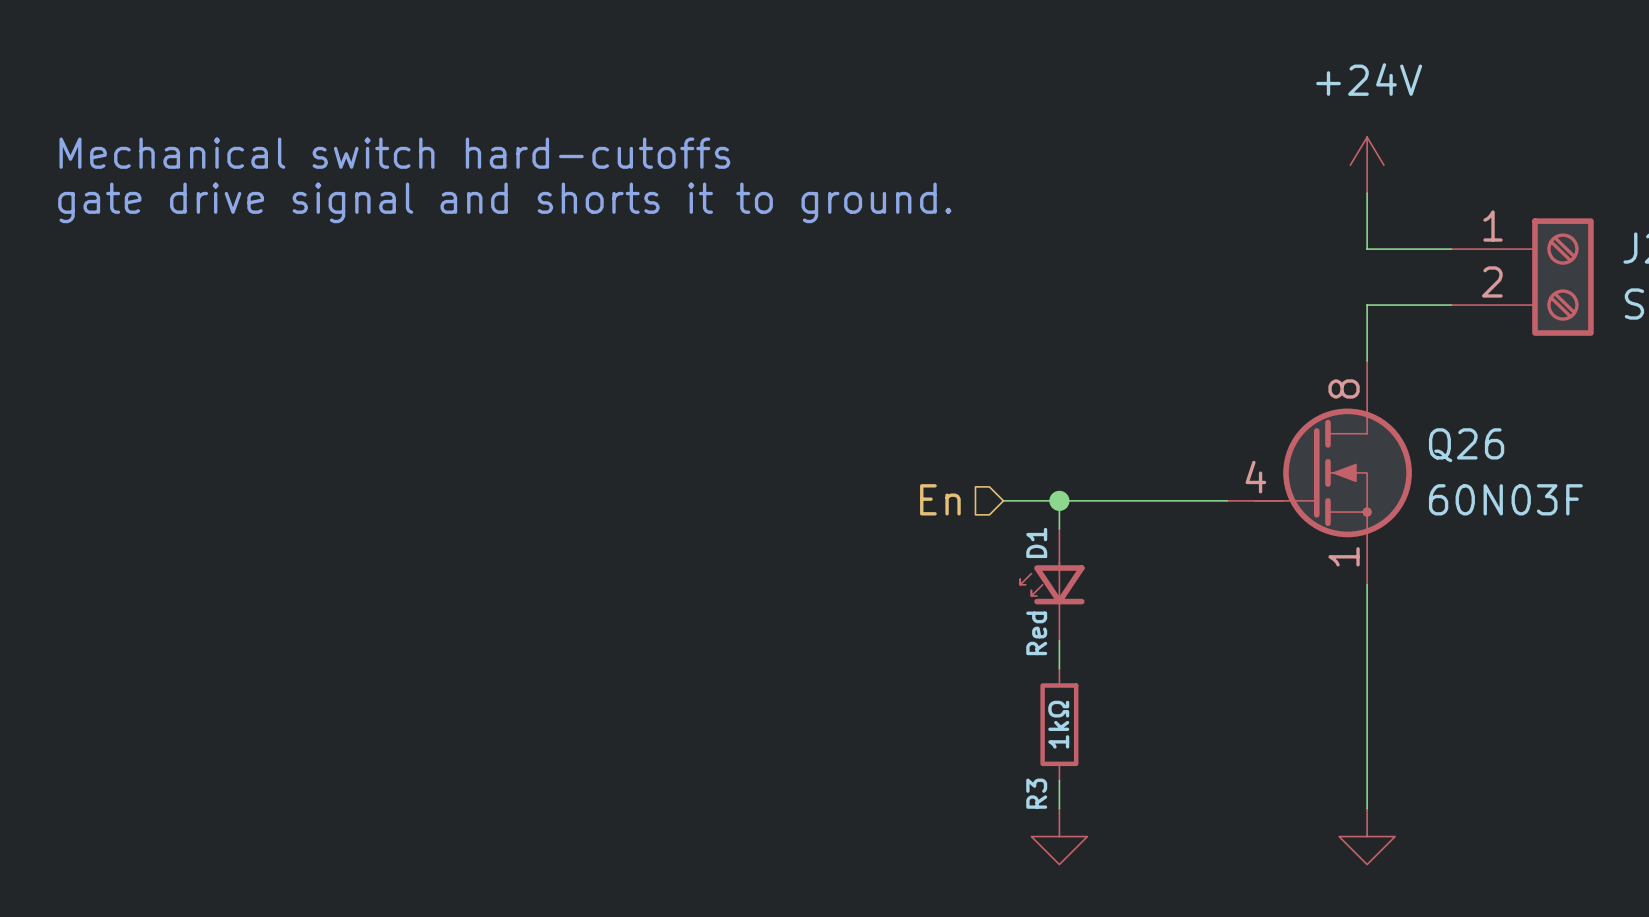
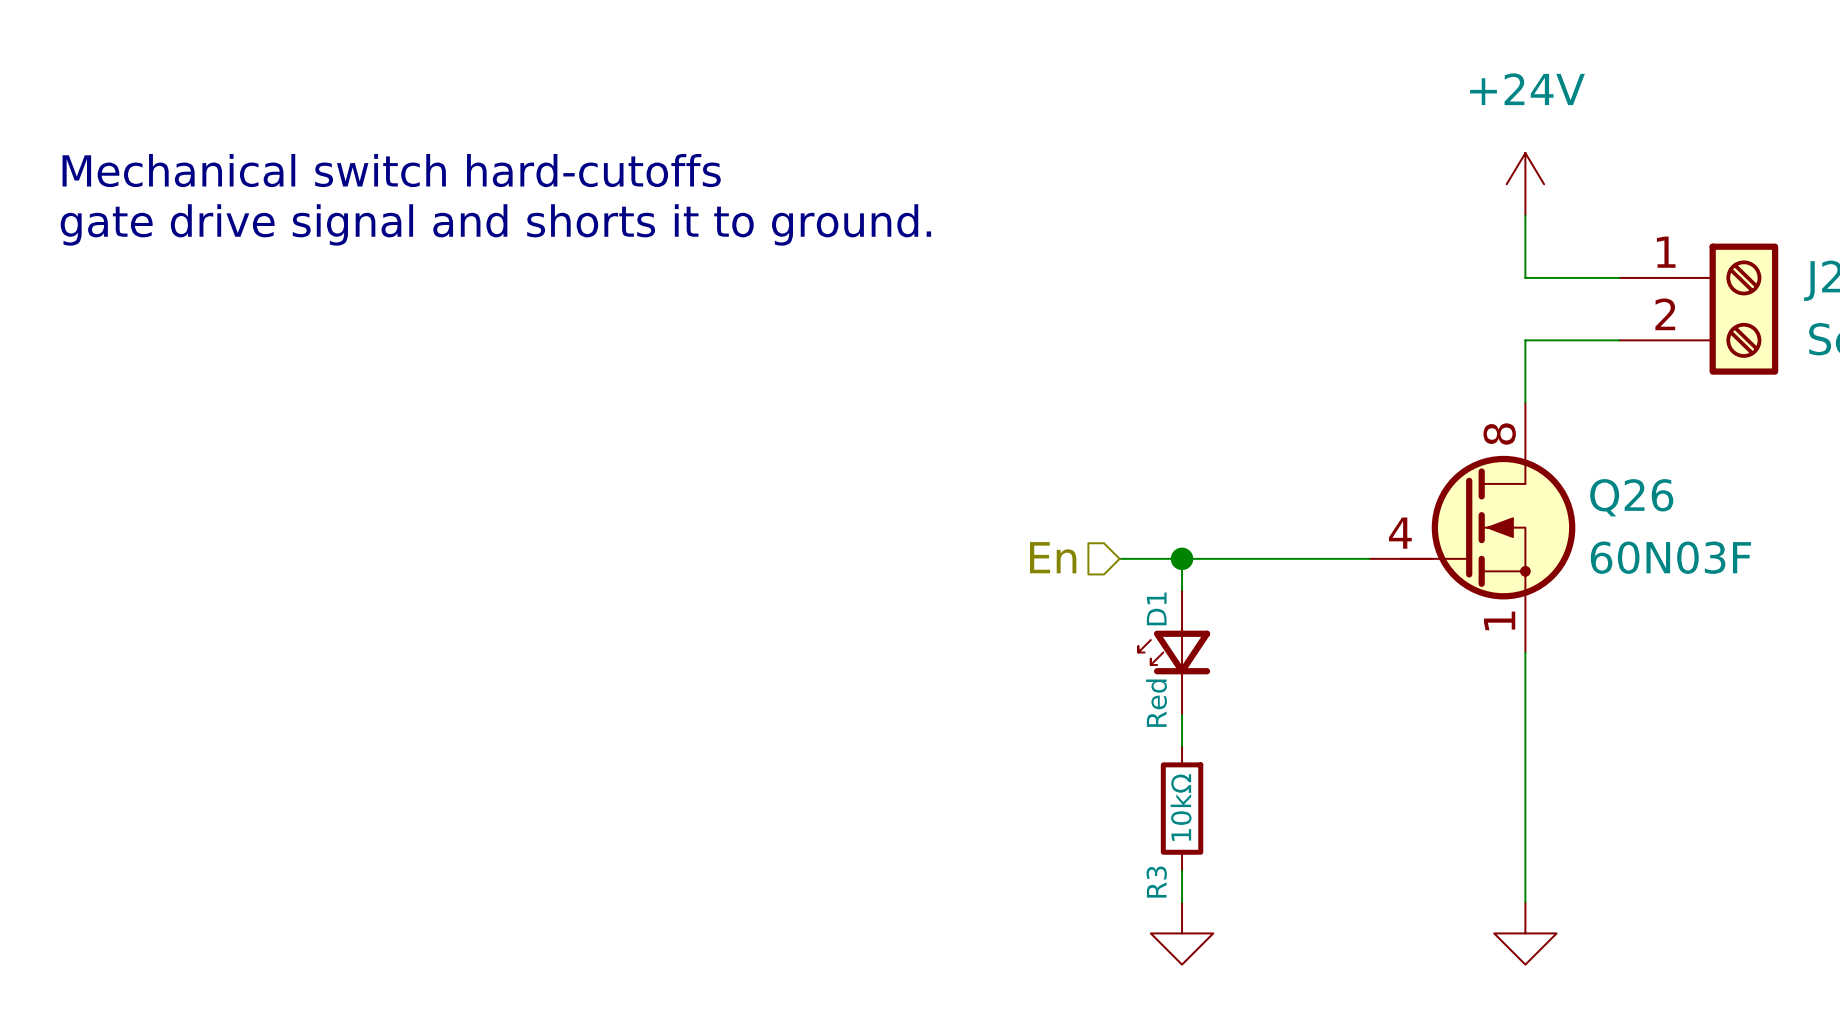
R3 value: 1kΩ (1058, 724) -> 10kΩ (1181, 807)

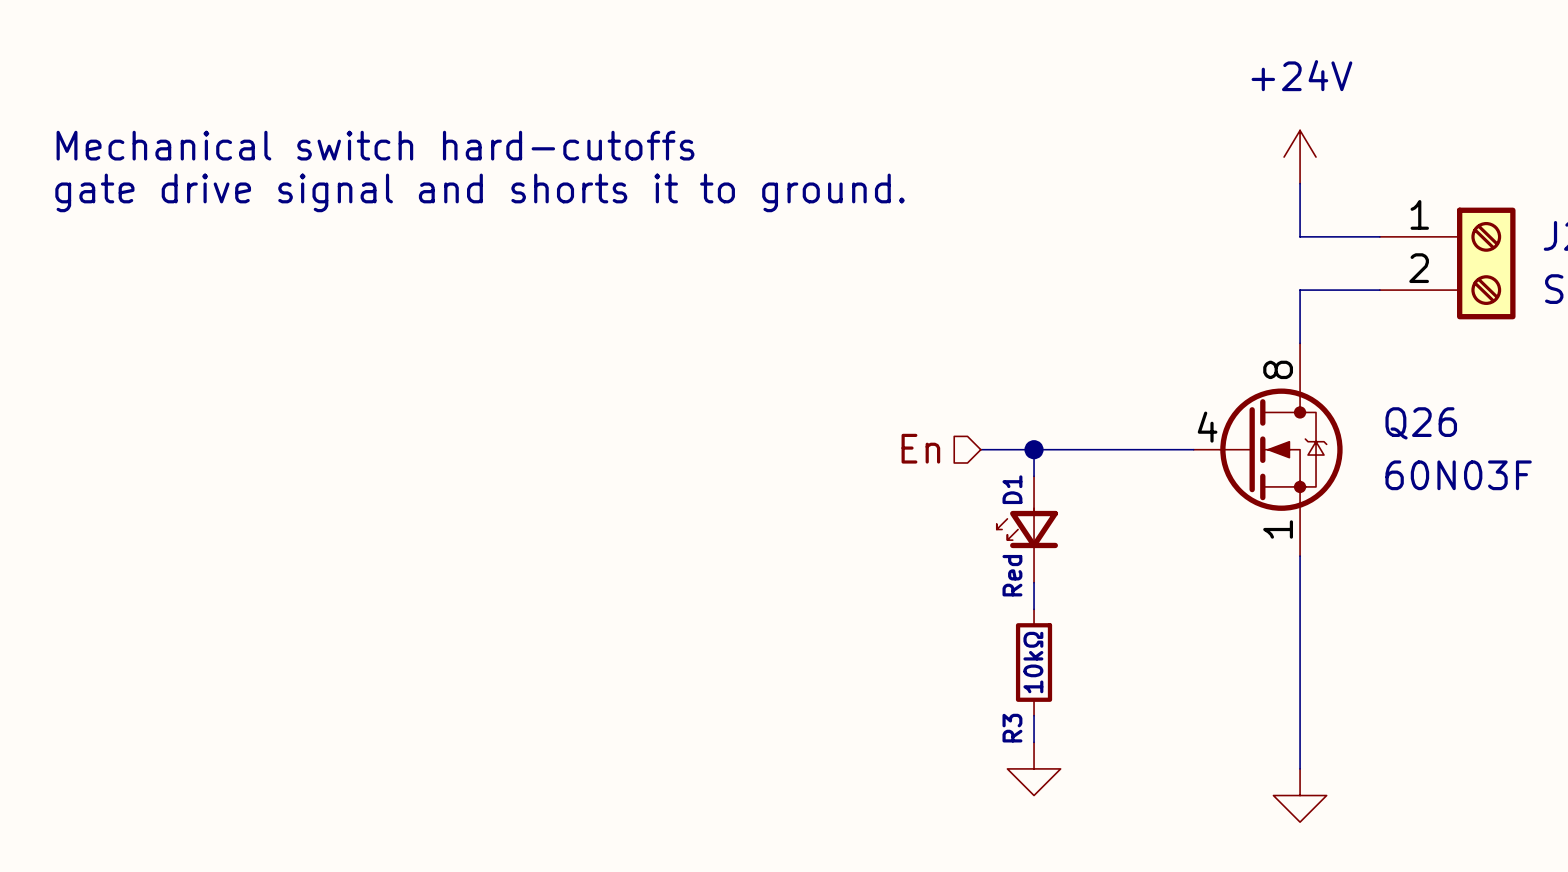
Q26 symbol: [1369, 402, 1576, 653] -> [1193, 343, 1343, 557]
hierarchical label position: En (1053, 557) -> En (920, 448)
wire: (1119, 558) (1369, 558) -> (980, 449) (1193, 449)
wire: (1182, 558) (1182, 590) -> (1034, 449) (1034, 476)
junction position: (1182, 558) -> (1034, 449)
D1 position: (1174, 652) -> (1027, 529)
wire: (1182, 714) (1182, 746) -> (1034, 582) (1034, 609)
R3 position: (1182, 808) -> (1034, 662)
wire: (1182, 870) (1182, 902) -> (1034, 715) (1034, 742)
power symbol position: (1182, 933) -> (1034, 768)

